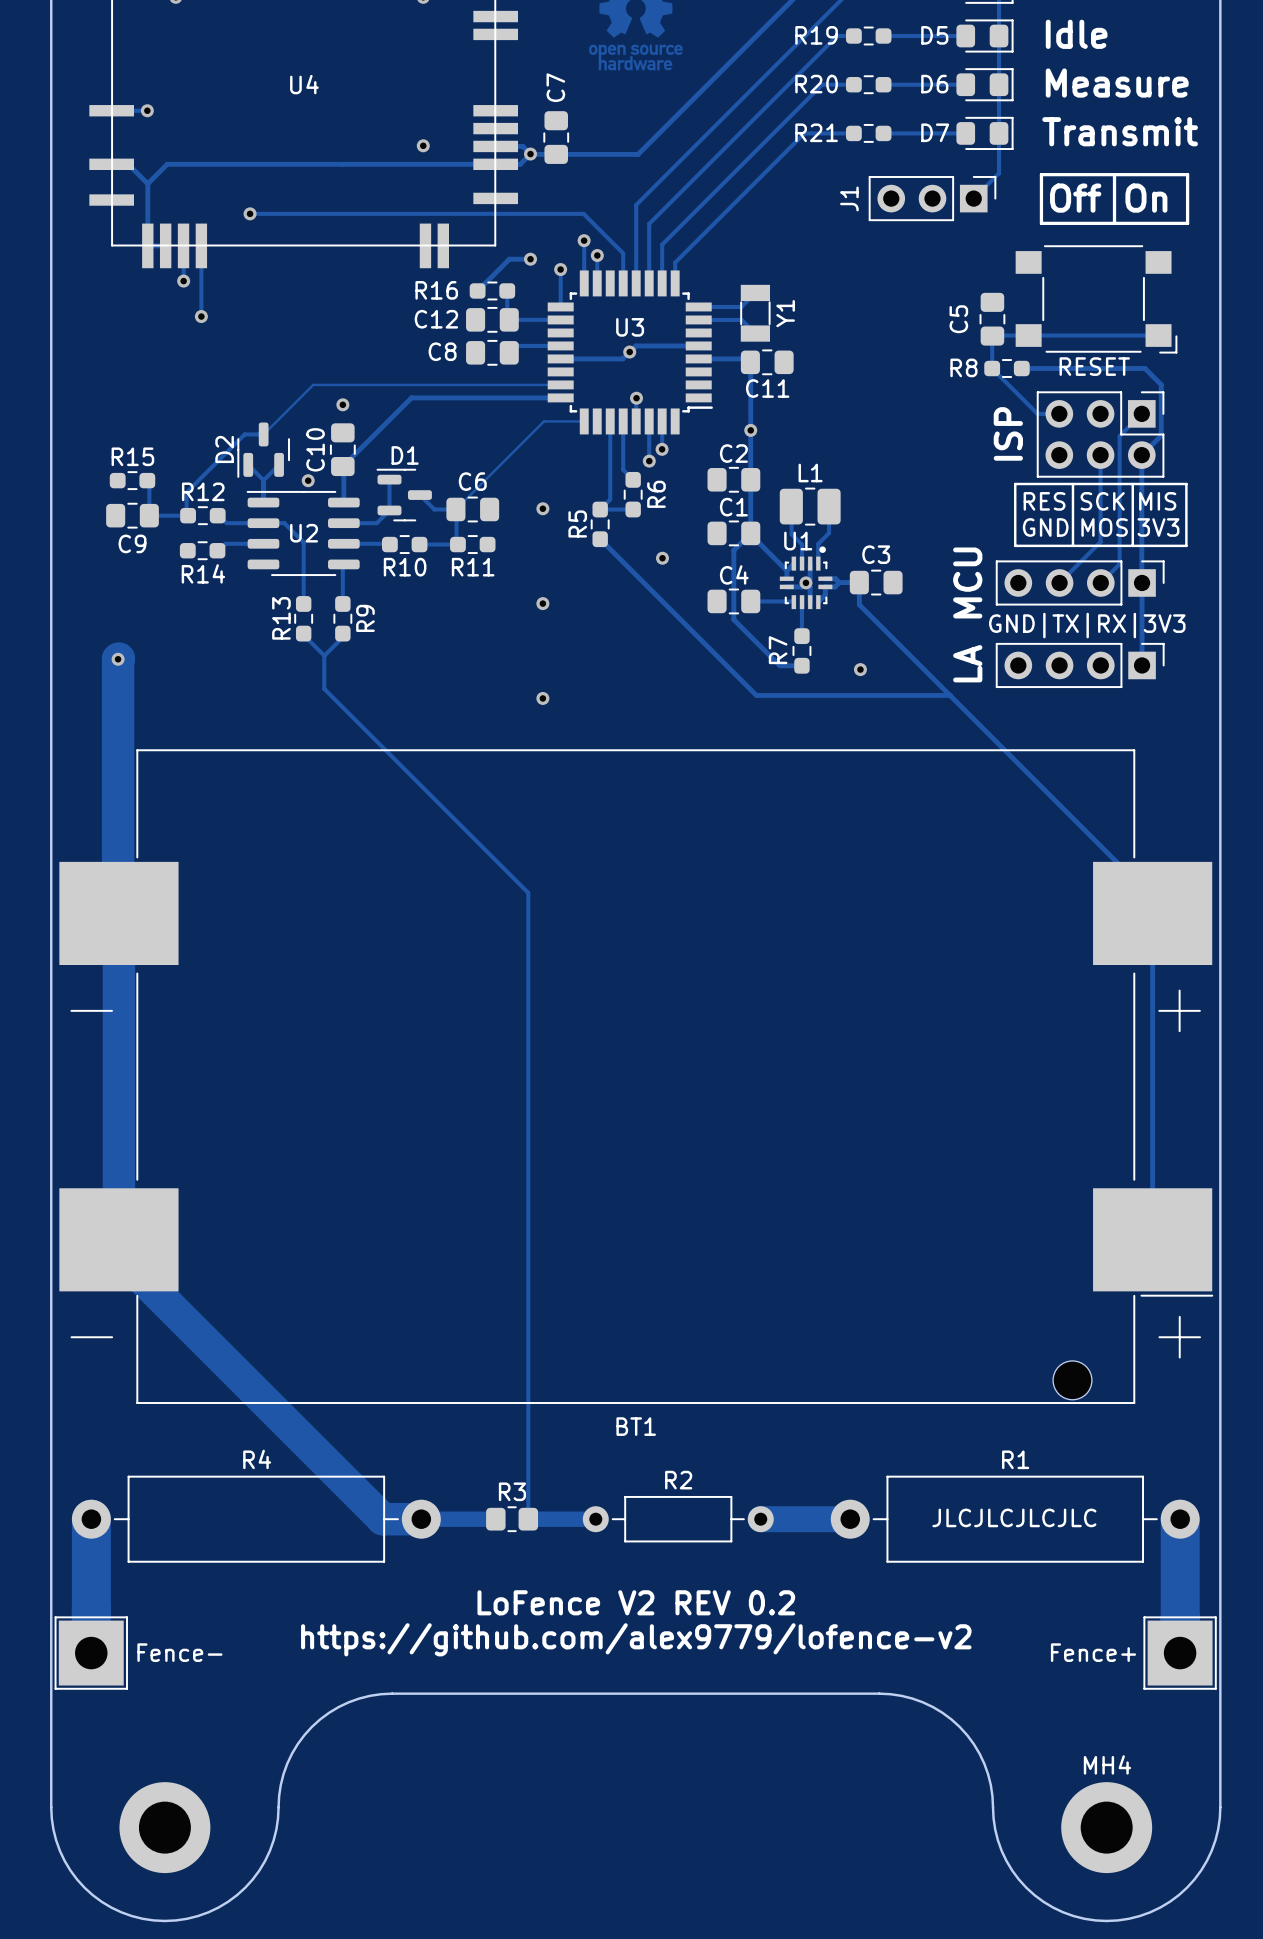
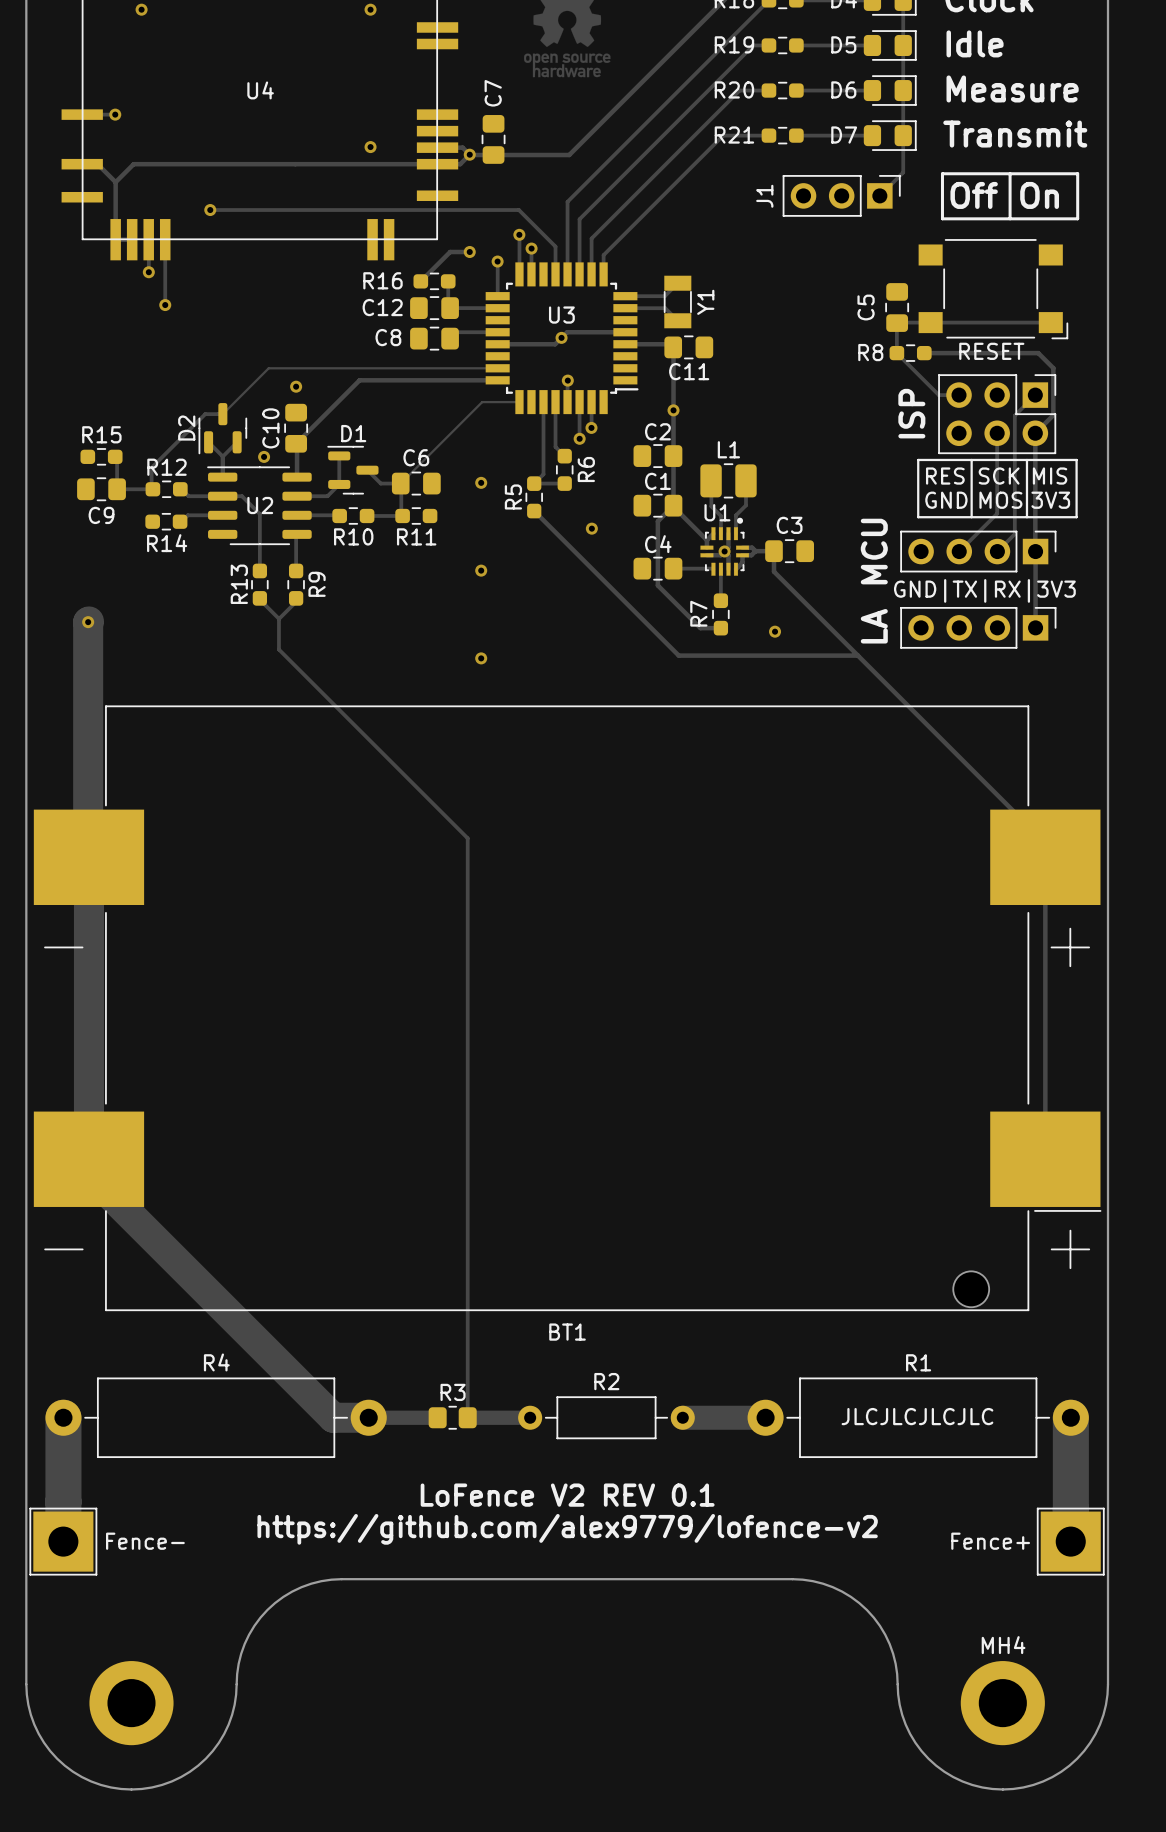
text: LoFence V2 REV 0.2 (636, 1602) -> LoFence V2 REV 0.1 (567, 1495)

